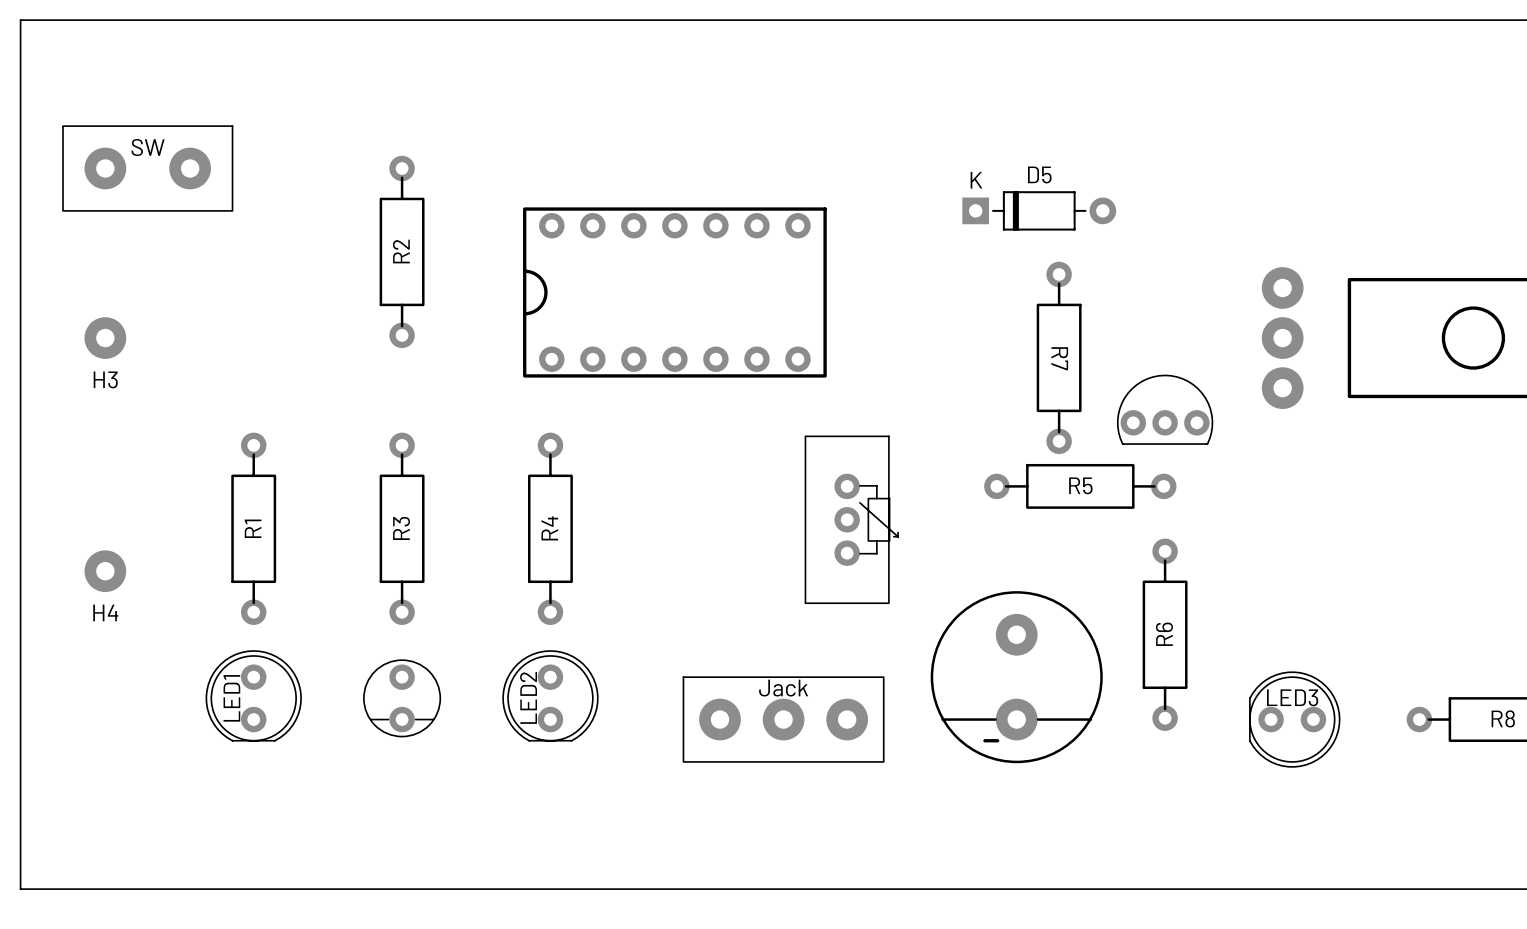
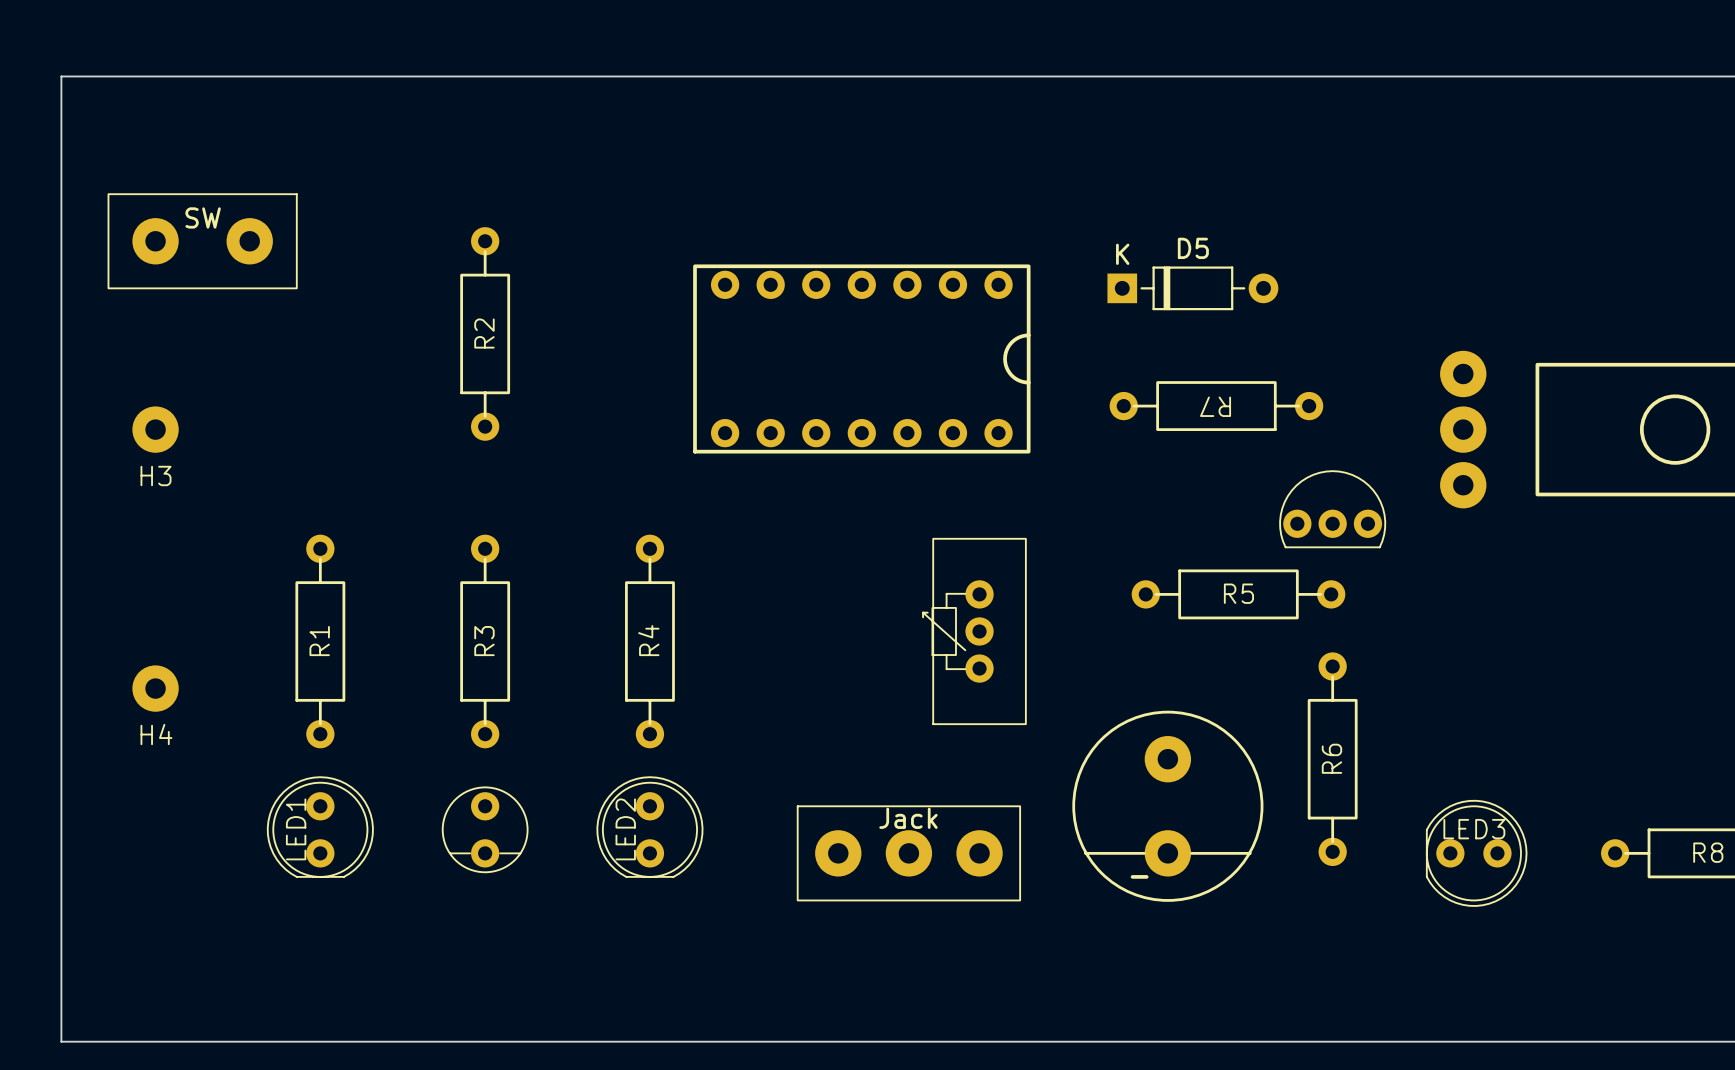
part rotation: 0° (674, 292) -> 180° (861, 358)
R7 rotation: 0° (1059, 357) -> 90° clockwise (1216, 406)
part rotation: 0° (851, 519) -> 180° (974, 631)

